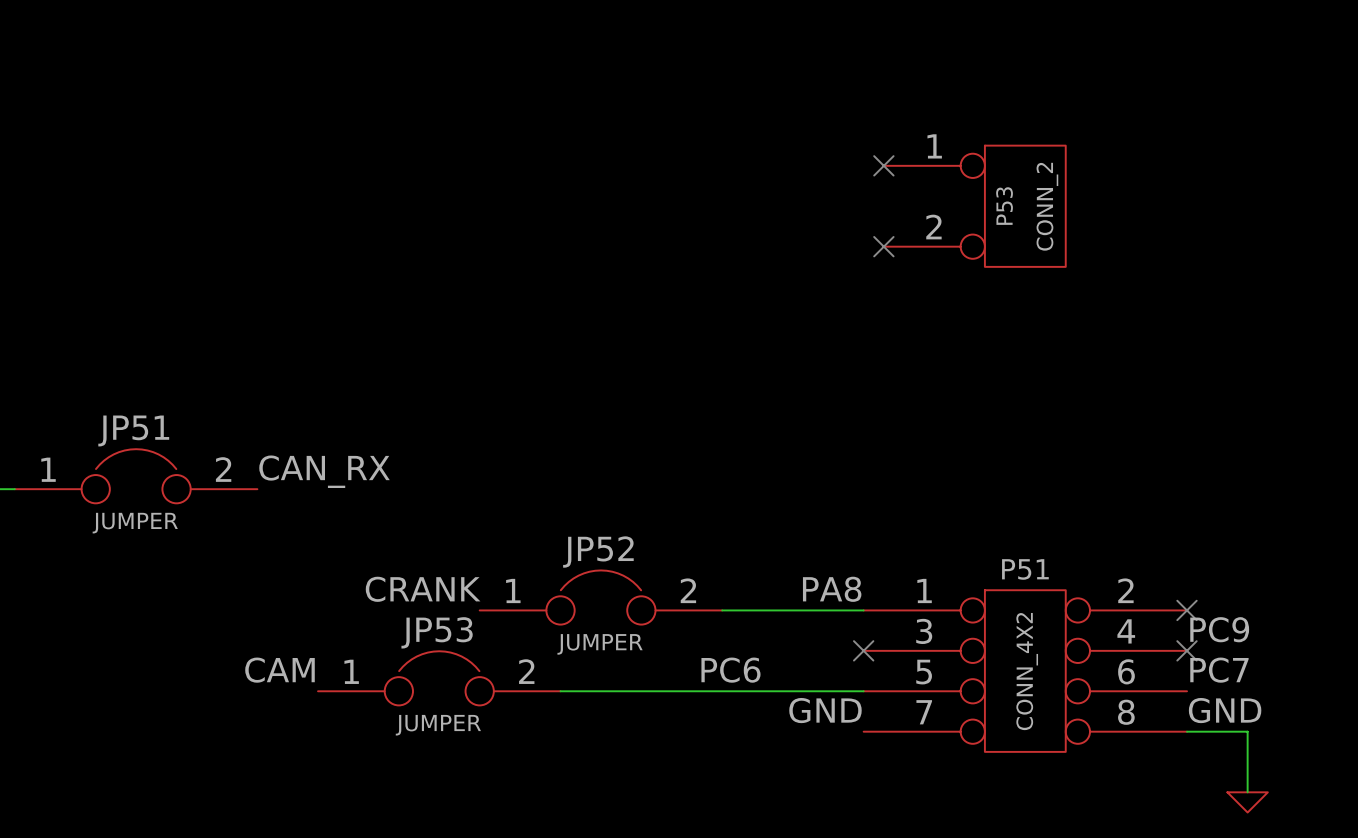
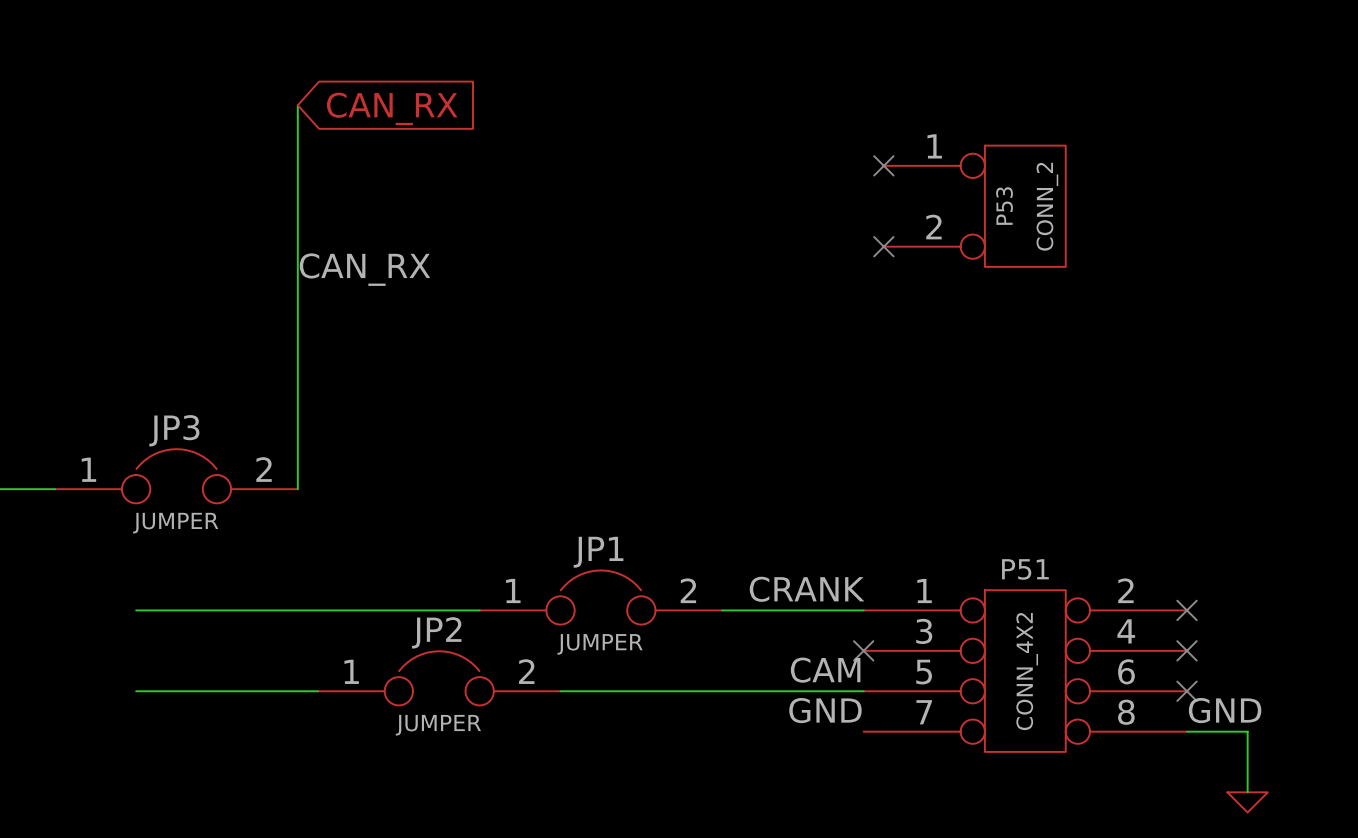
wire: none -> (297, 105) (297, 489)
global label: none -> CAN_RX (392, 108)
label position: CAN_RX (324, 471) -> CAN_RX (364, 269)
JP51: JUMPER (136, 476) -> none
JP3: none -> JUMPER (176, 476)
JP52 name: JP52 (598, 552) -> JP1 (598, 552)
label: CRANK (423, 589) -> none
label: PA8 (832, 589) -> CRANK (807, 589)
wire: none -> (136, 610) (479, 610)
label: PC9 (1219, 629) -> none
JP53 name: JP53 (437, 632) -> JP2 (436, 632)
label: CAM (279, 670) -> none
label: PC6 (730, 670) -> none
label: none -> CAM (825, 670)
label: PC7 (1219, 670) -> none
wire: none -> (136, 691) (318, 691)
no-connect mark: none -> (1187, 691)

